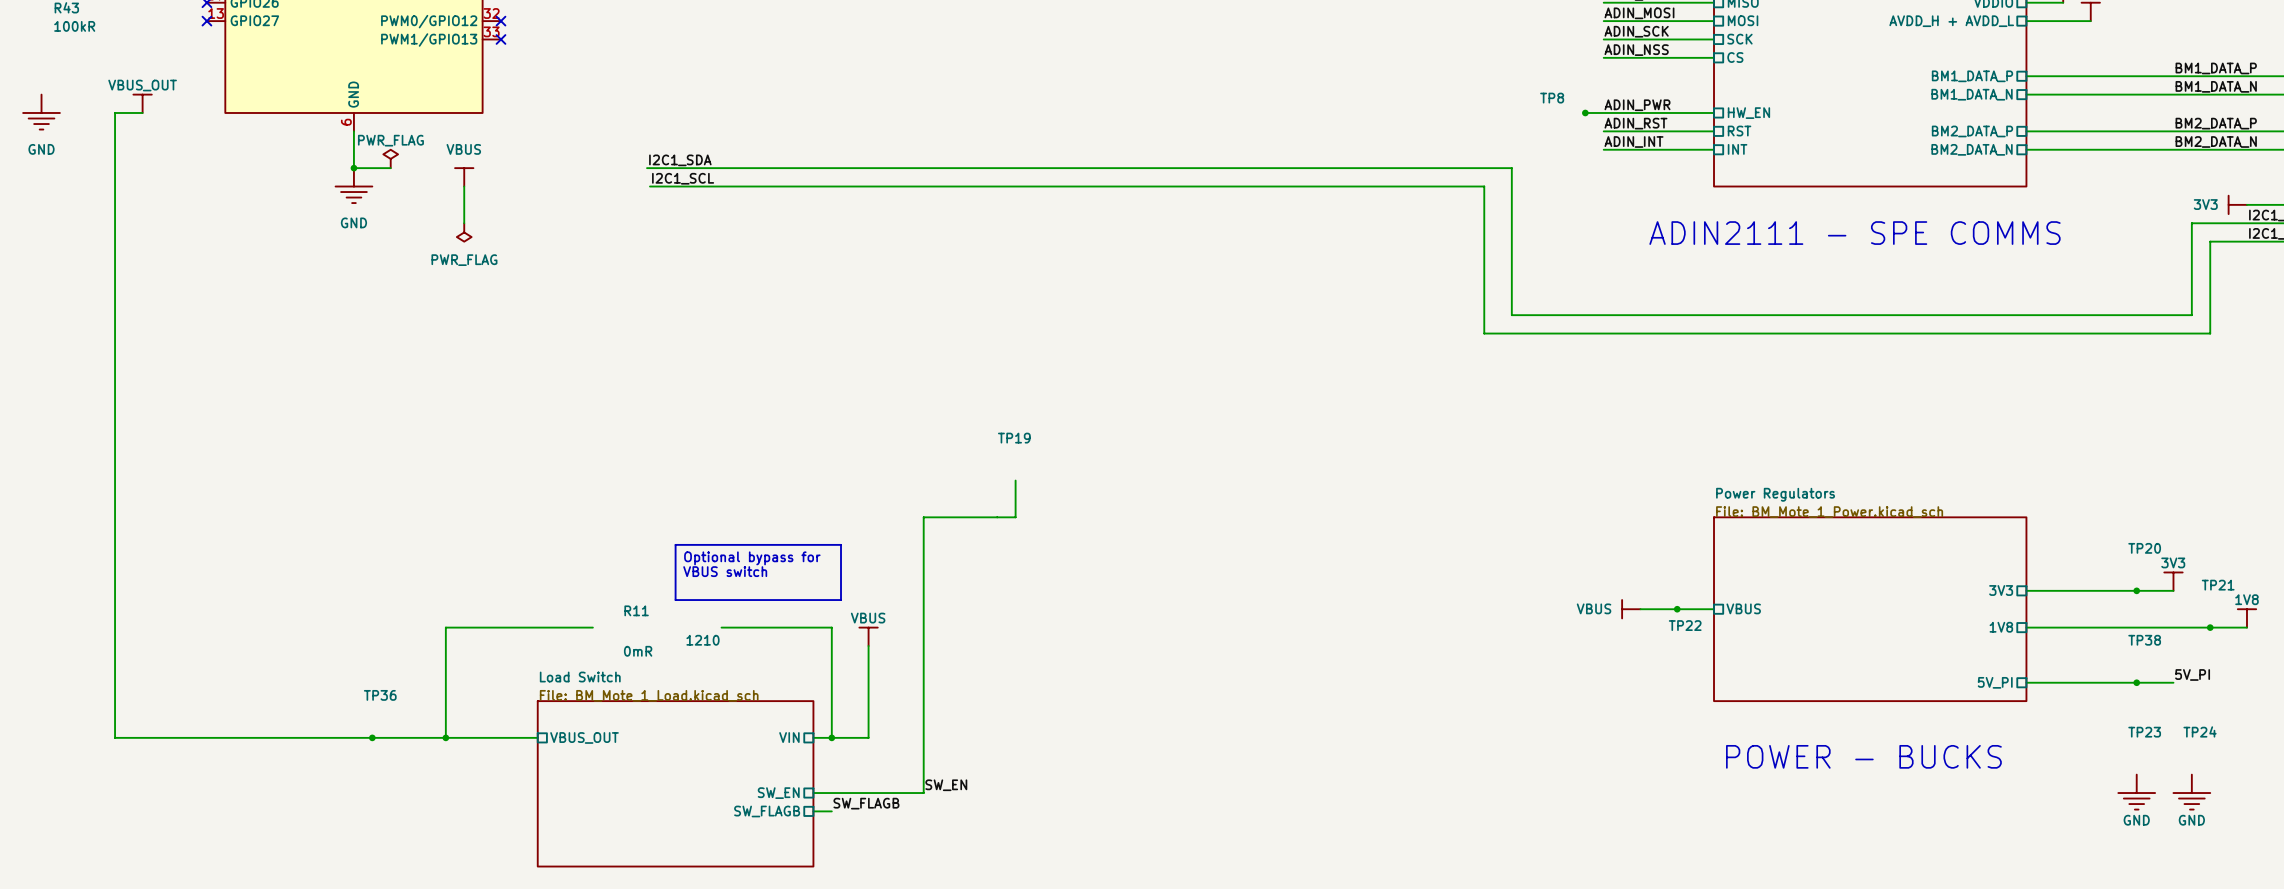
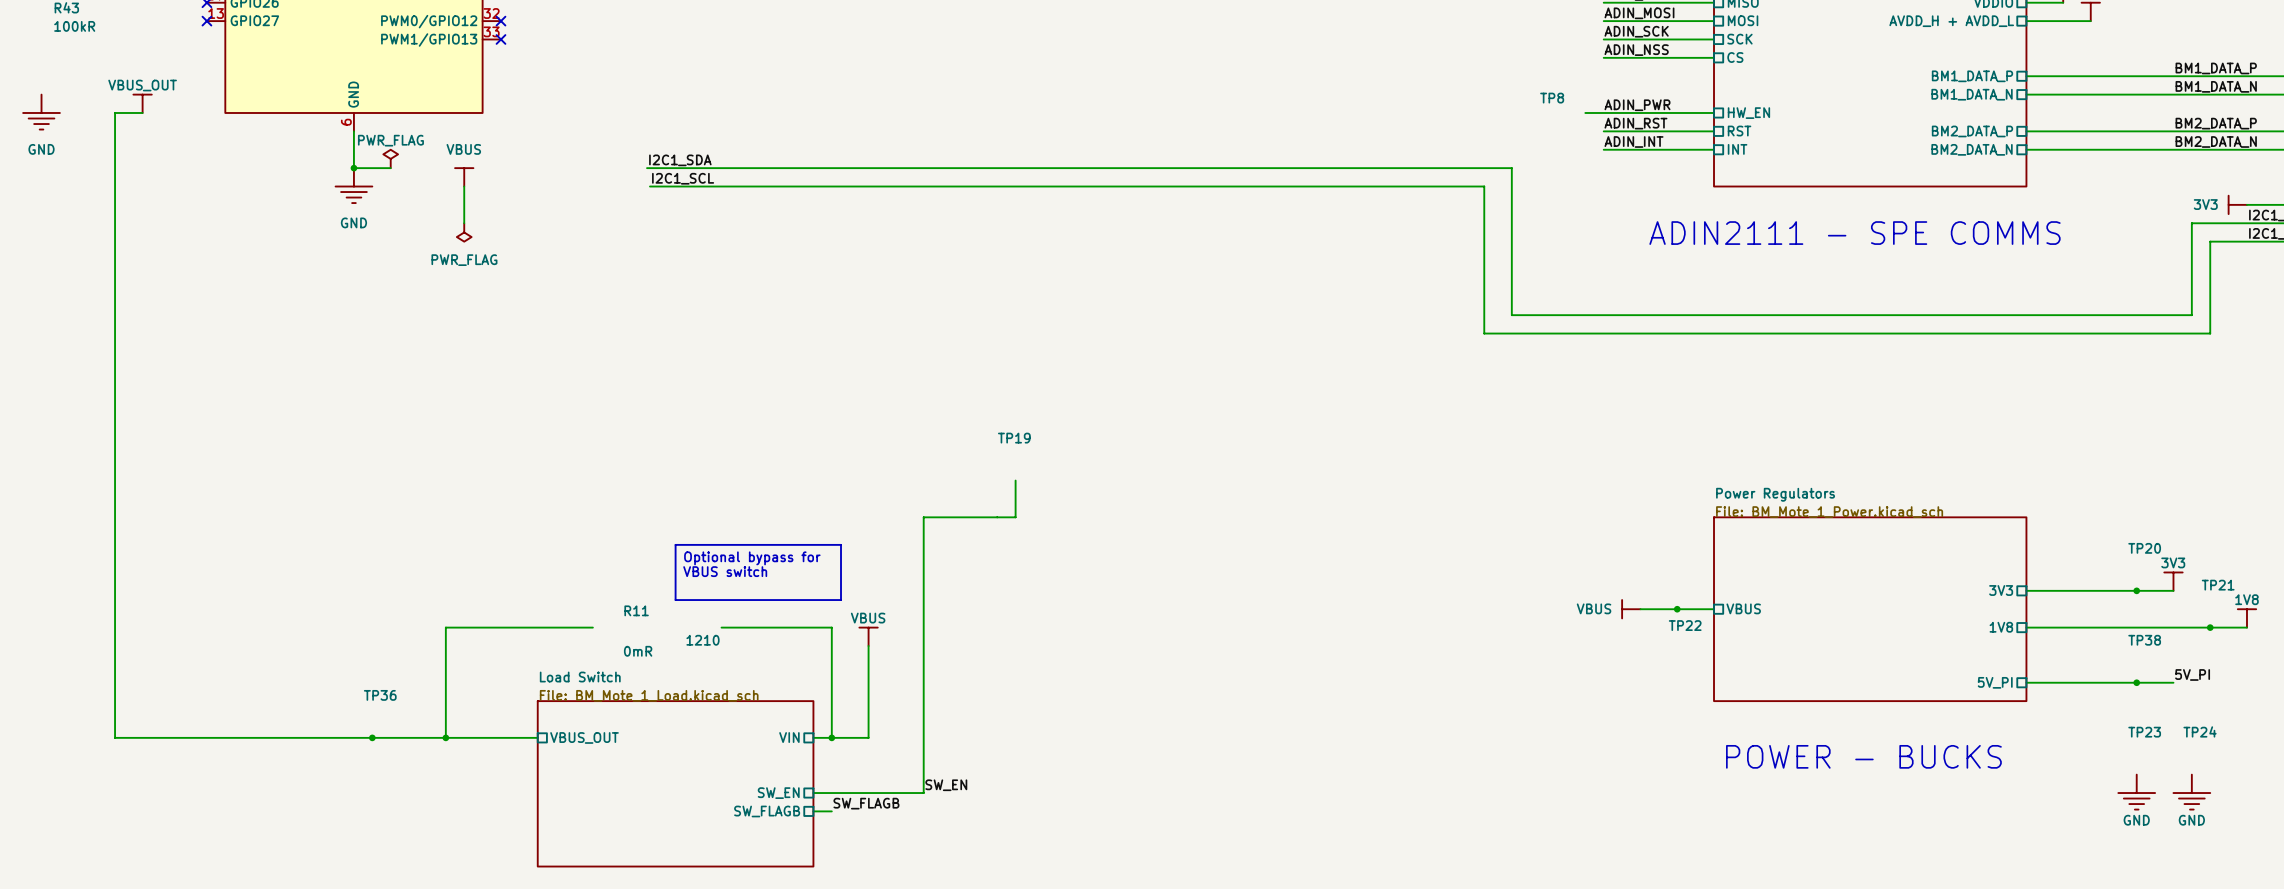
junction: (1585, 112) -> none

